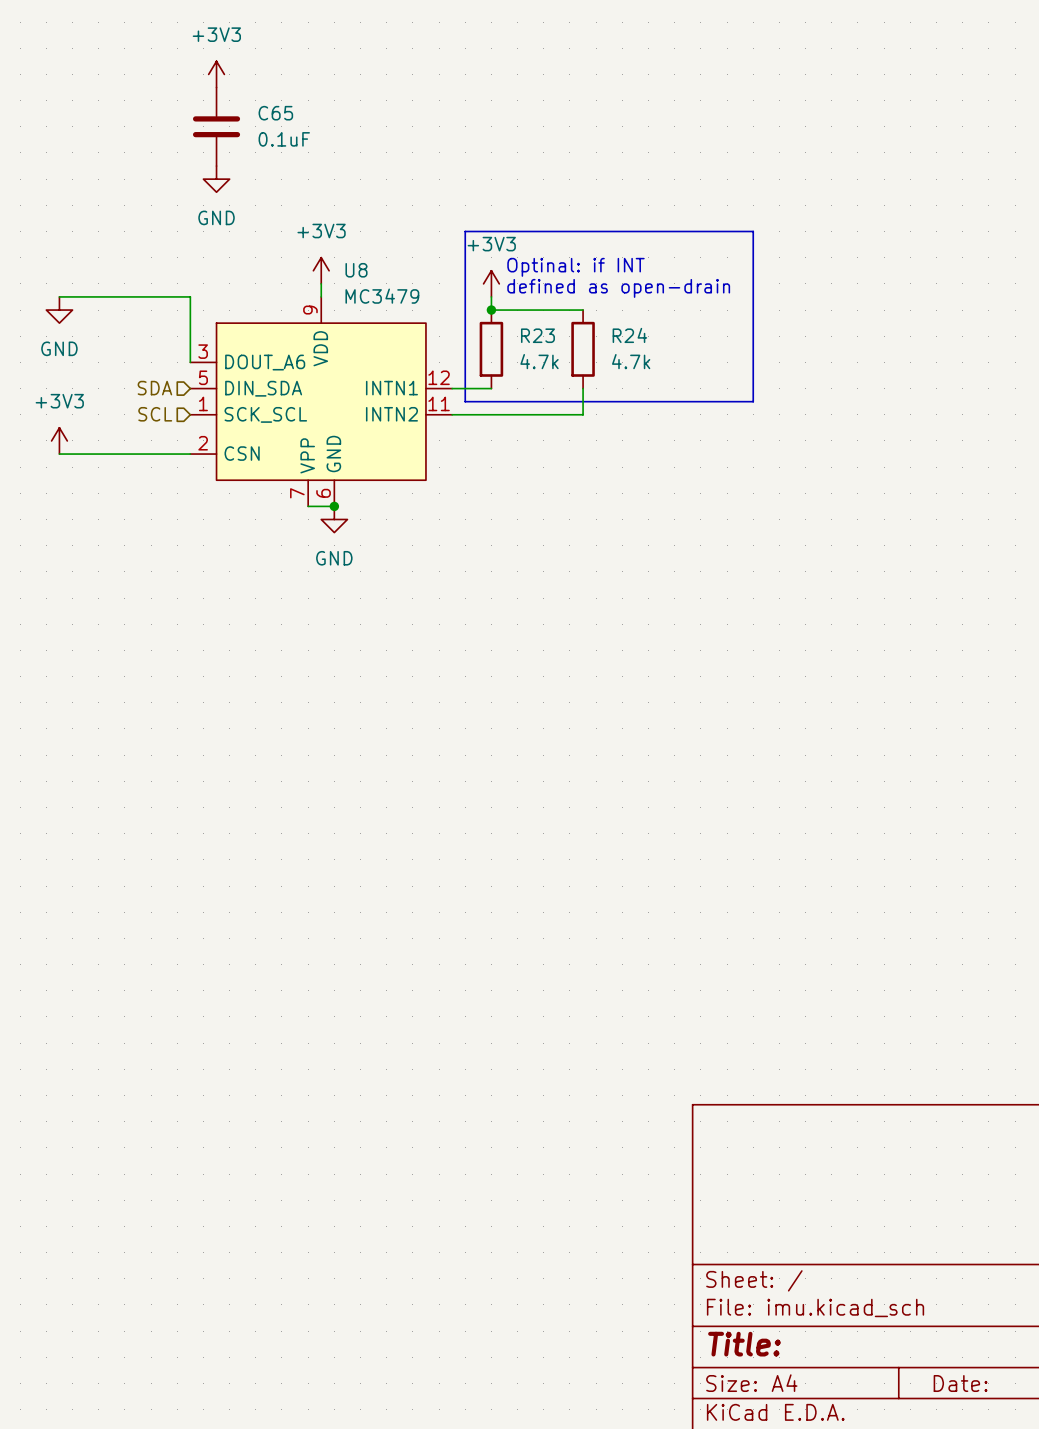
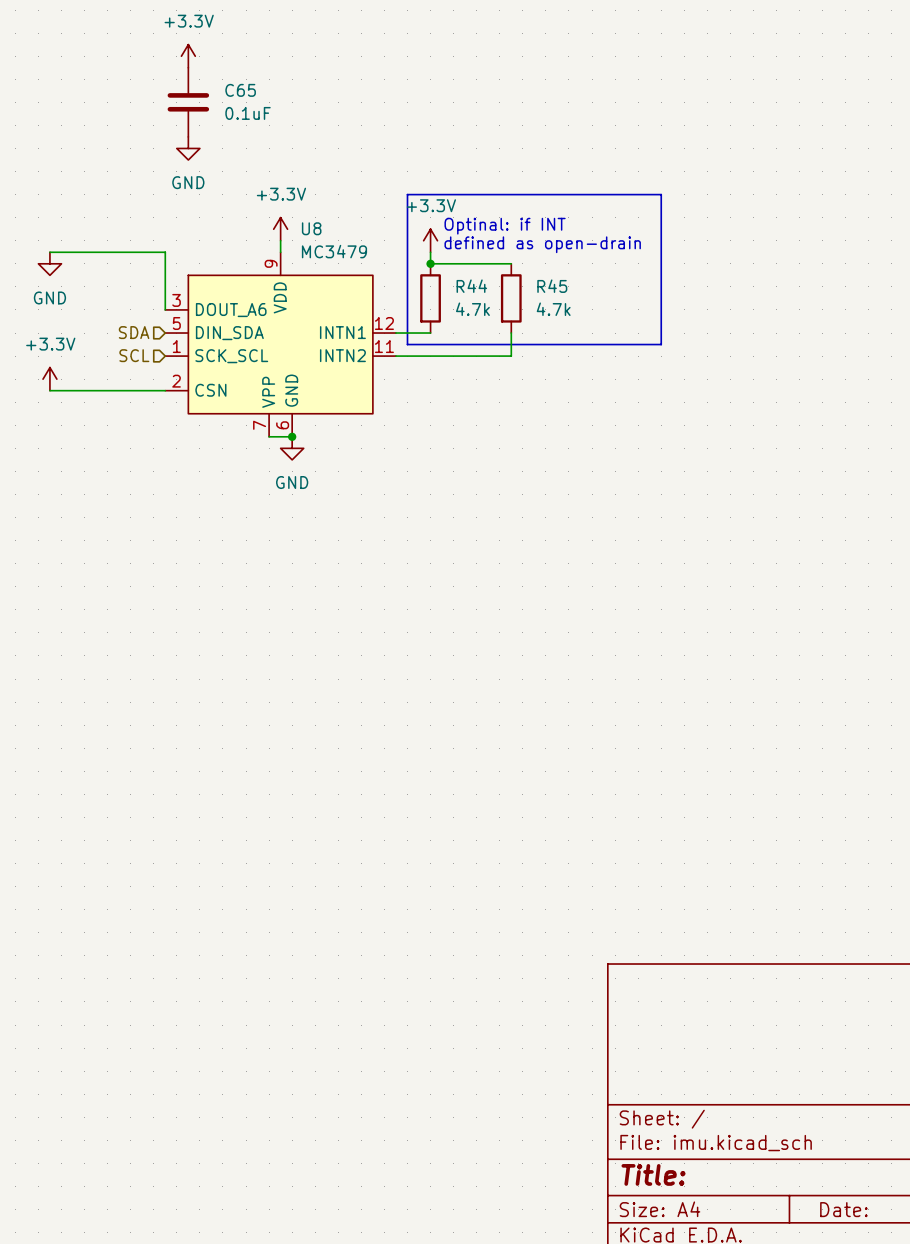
power symbol: +3V3 (216, 74) -> +3.3V (188, 56)
power symbol: +3V3 (321, 270) -> +3.3V (280, 229)
power symbol: +3V3 (491, 283) -> +3.3V (430, 240)
R23 name: R23 (537, 335) -> R44 (471, 286)
R24 name: R24 (629, 335) -> R45 (552, 286)
power symbol: +3V3 (59, 440) -> +3.3V (49, 379)

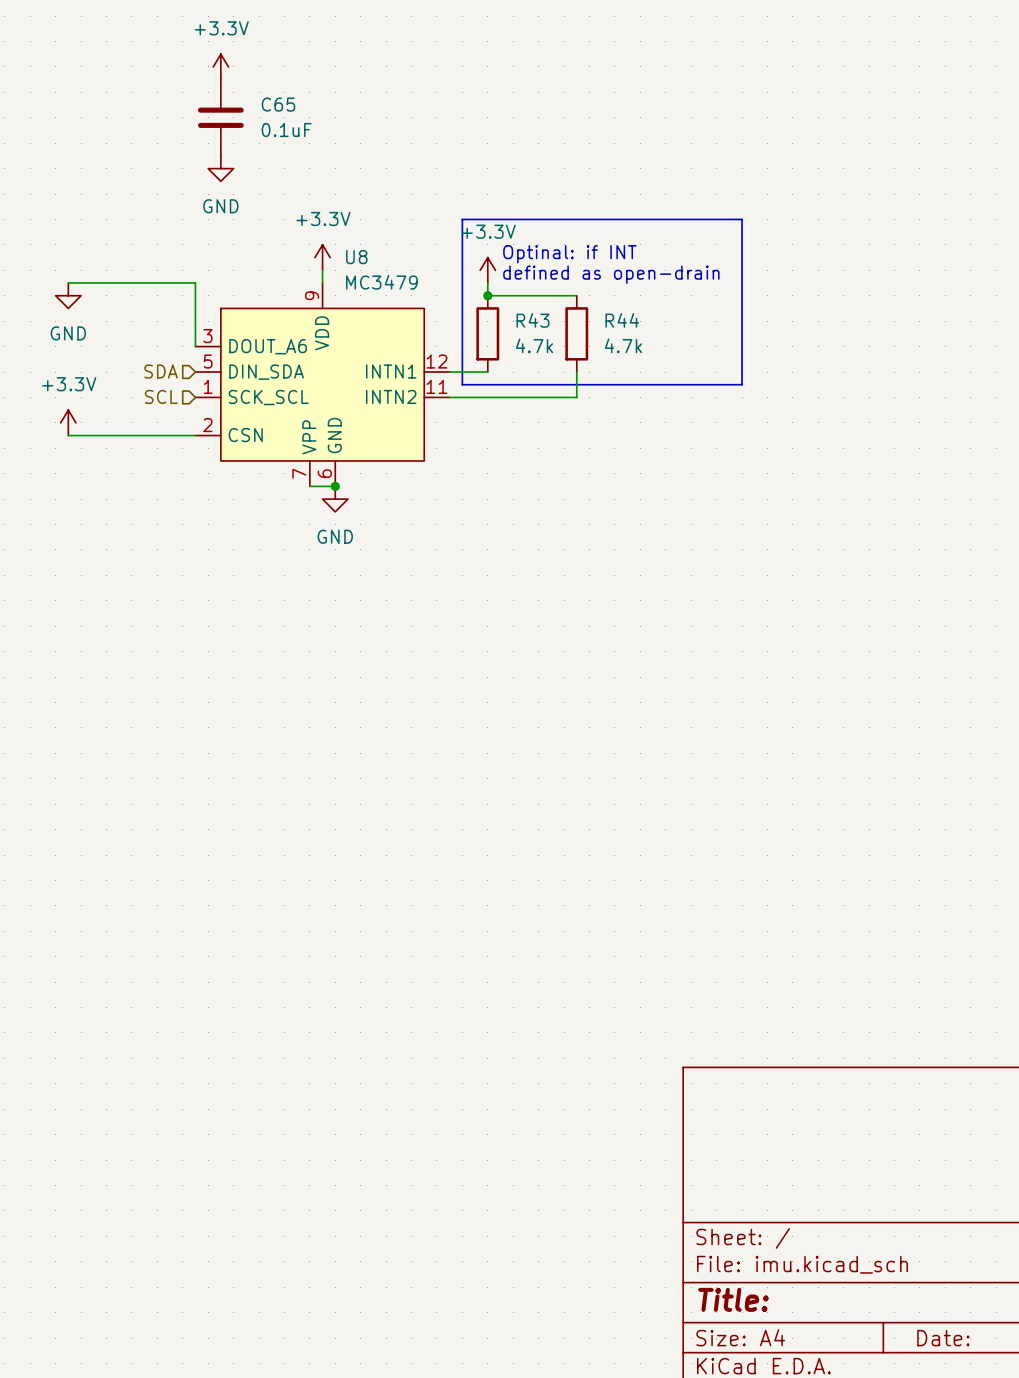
R44 name: R44 (471, 286) -> R43 (532, 320)
R45 name: R45 (552, 286) -> R44 (622, 320)

